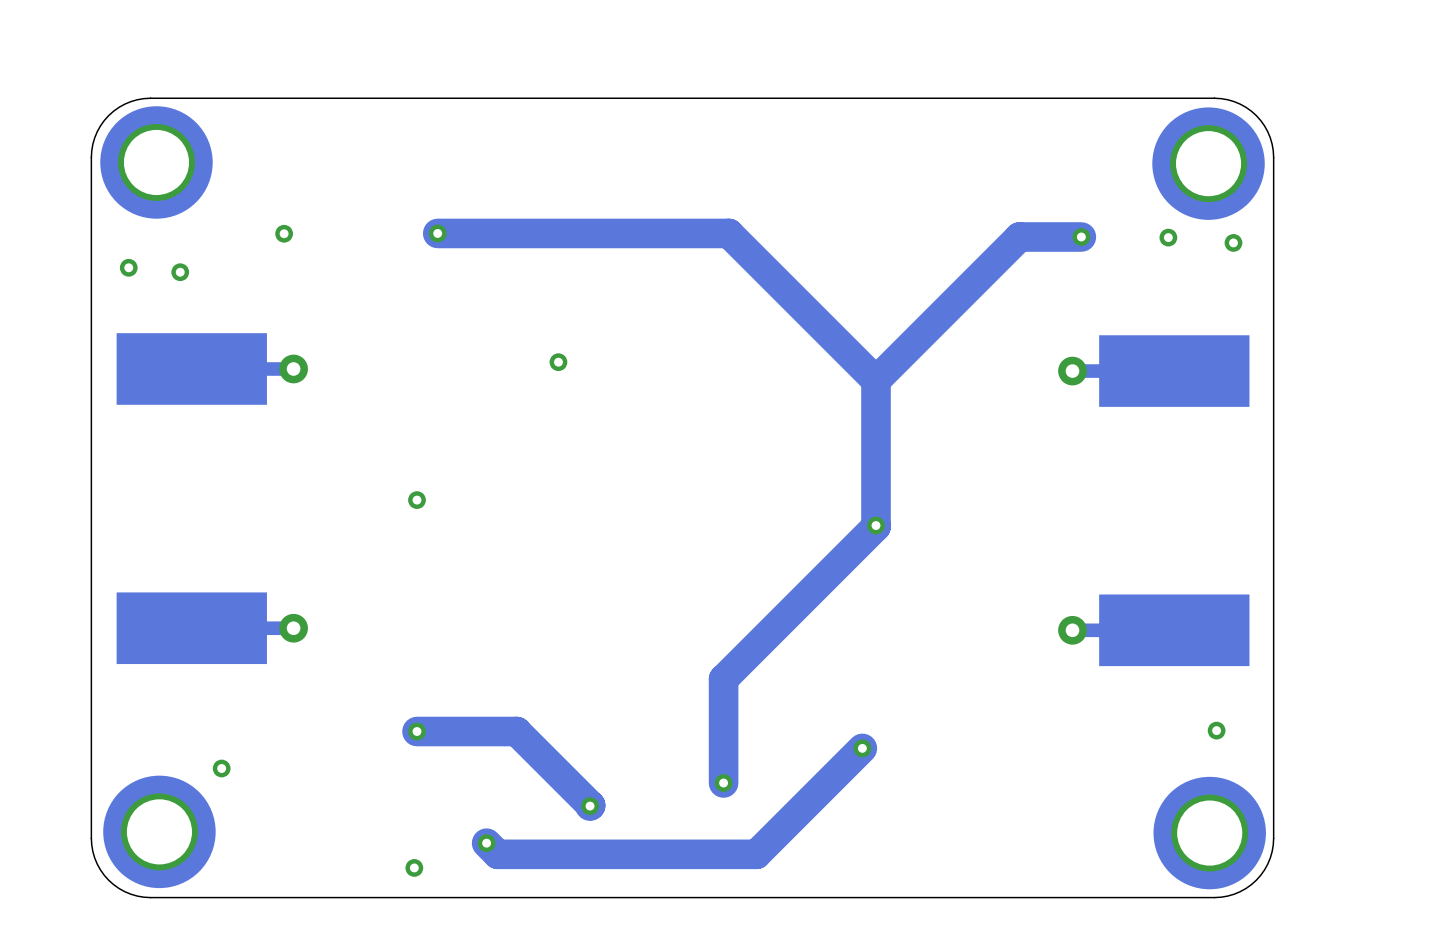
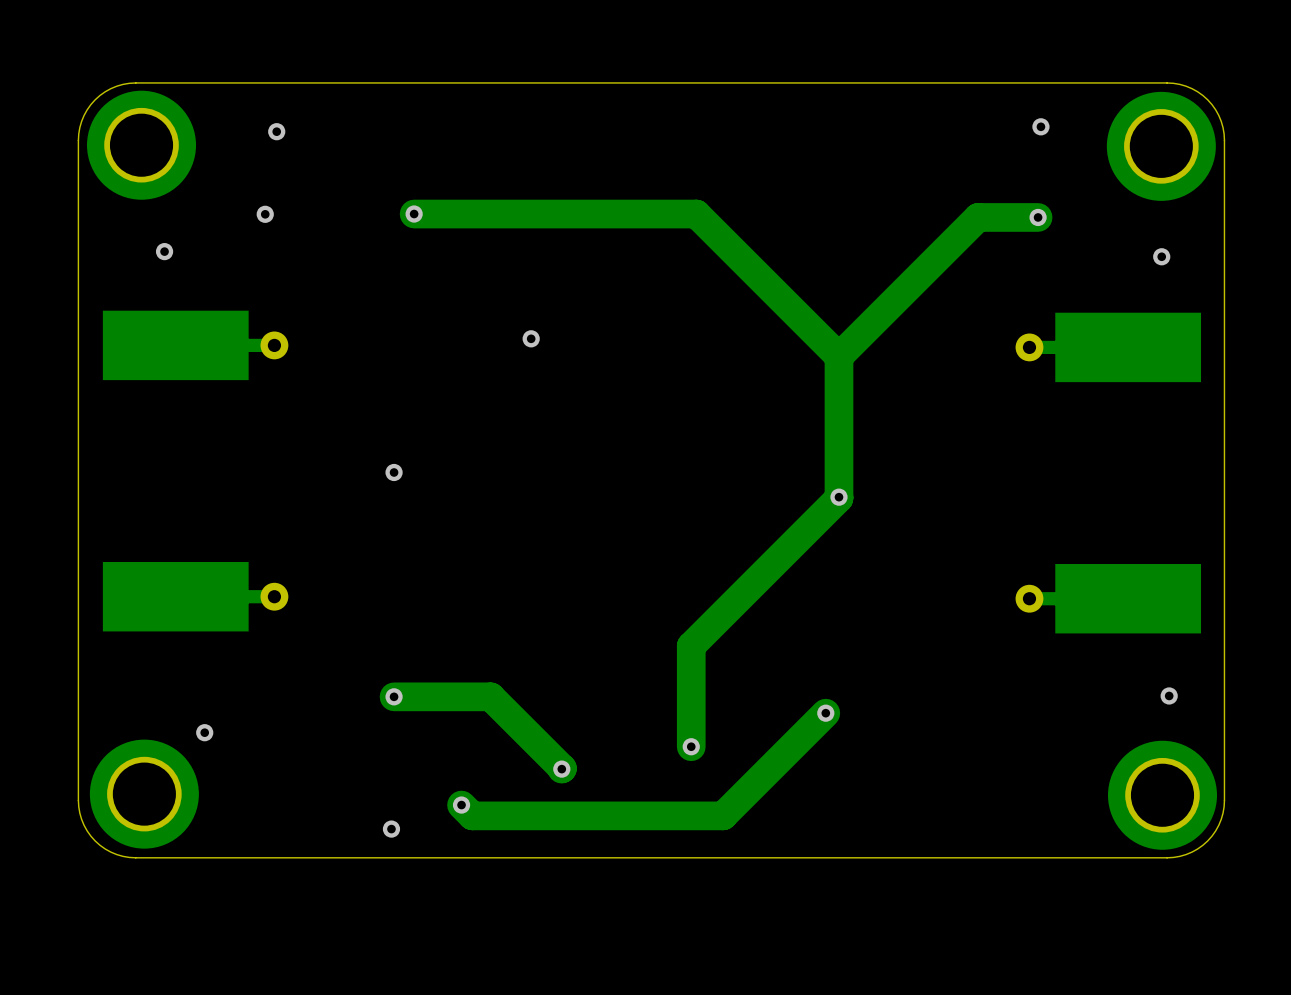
via: none -> (1040, 126)
via: none -> (276, 131)
via: (1168, 237) -> none
via: (1233, 242) -> none
via: (128, 267) -> none
via: none -> (1161, 256)

